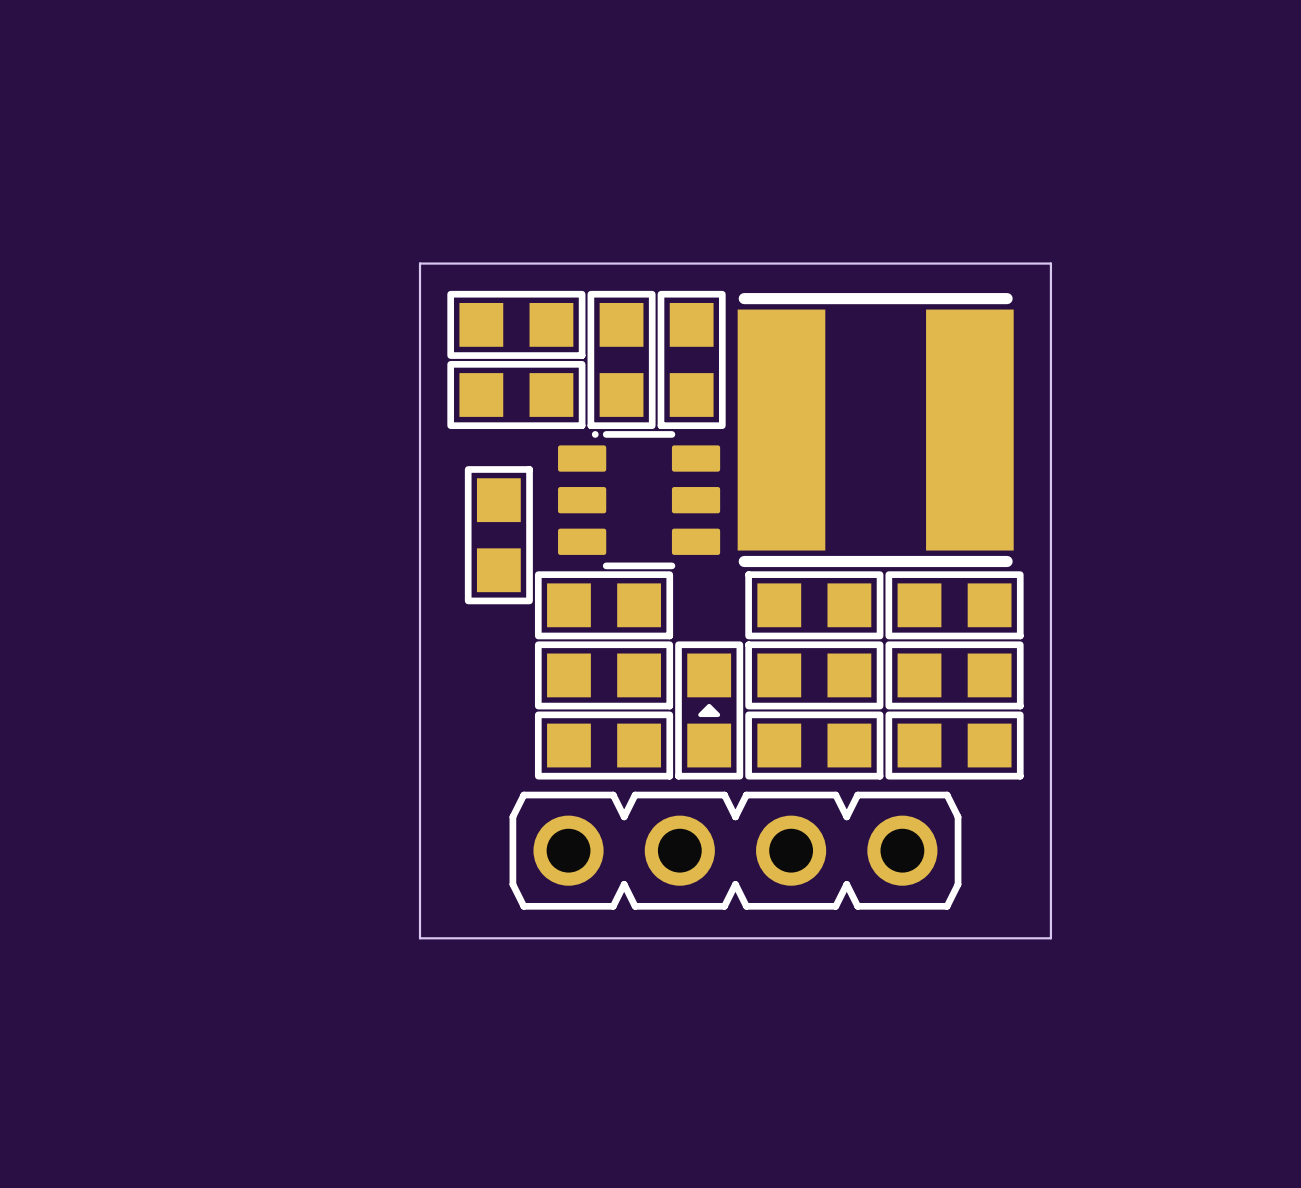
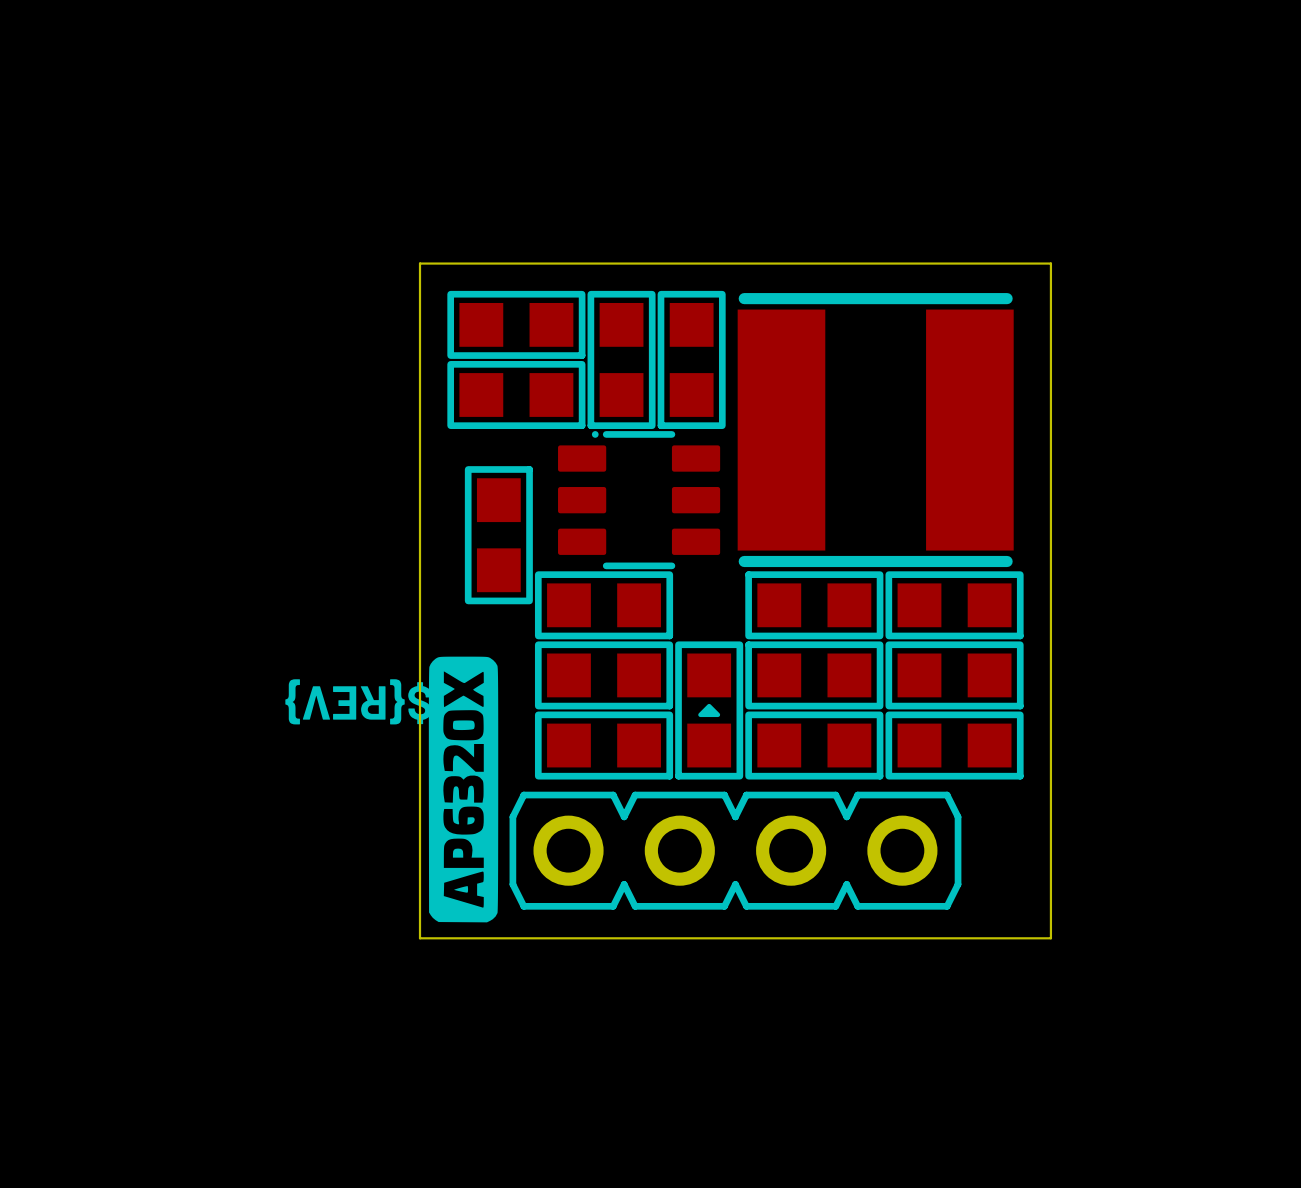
drawing: none -> [428, 656, 499, 923]
text: none -> ${REV} (358, 701)

